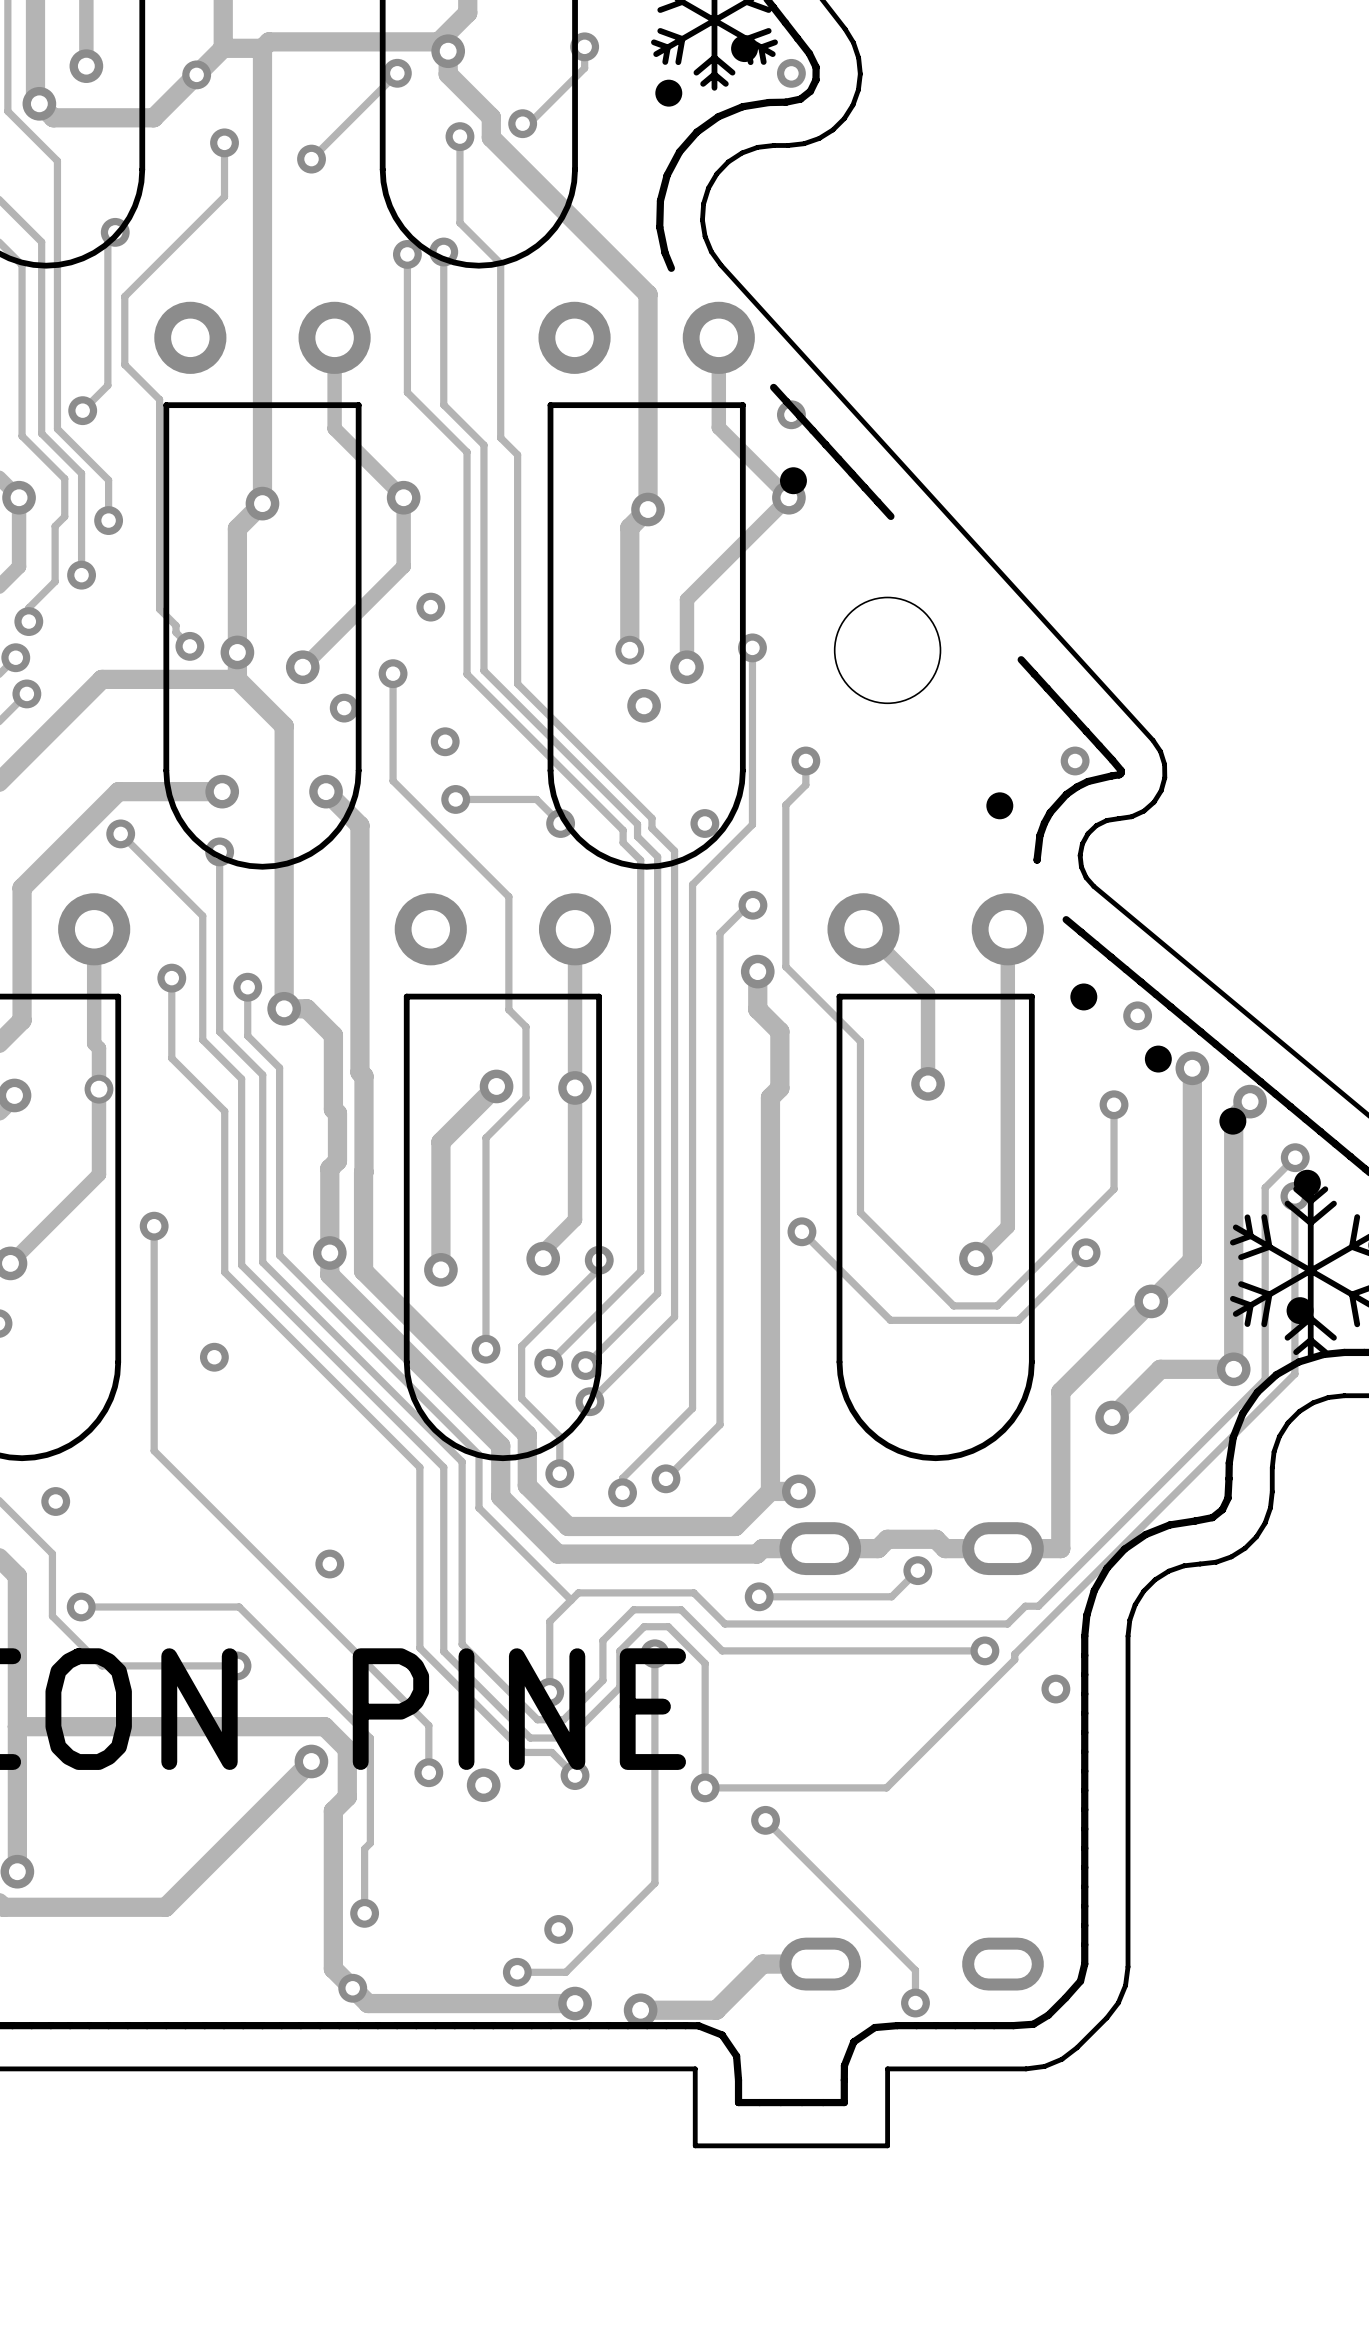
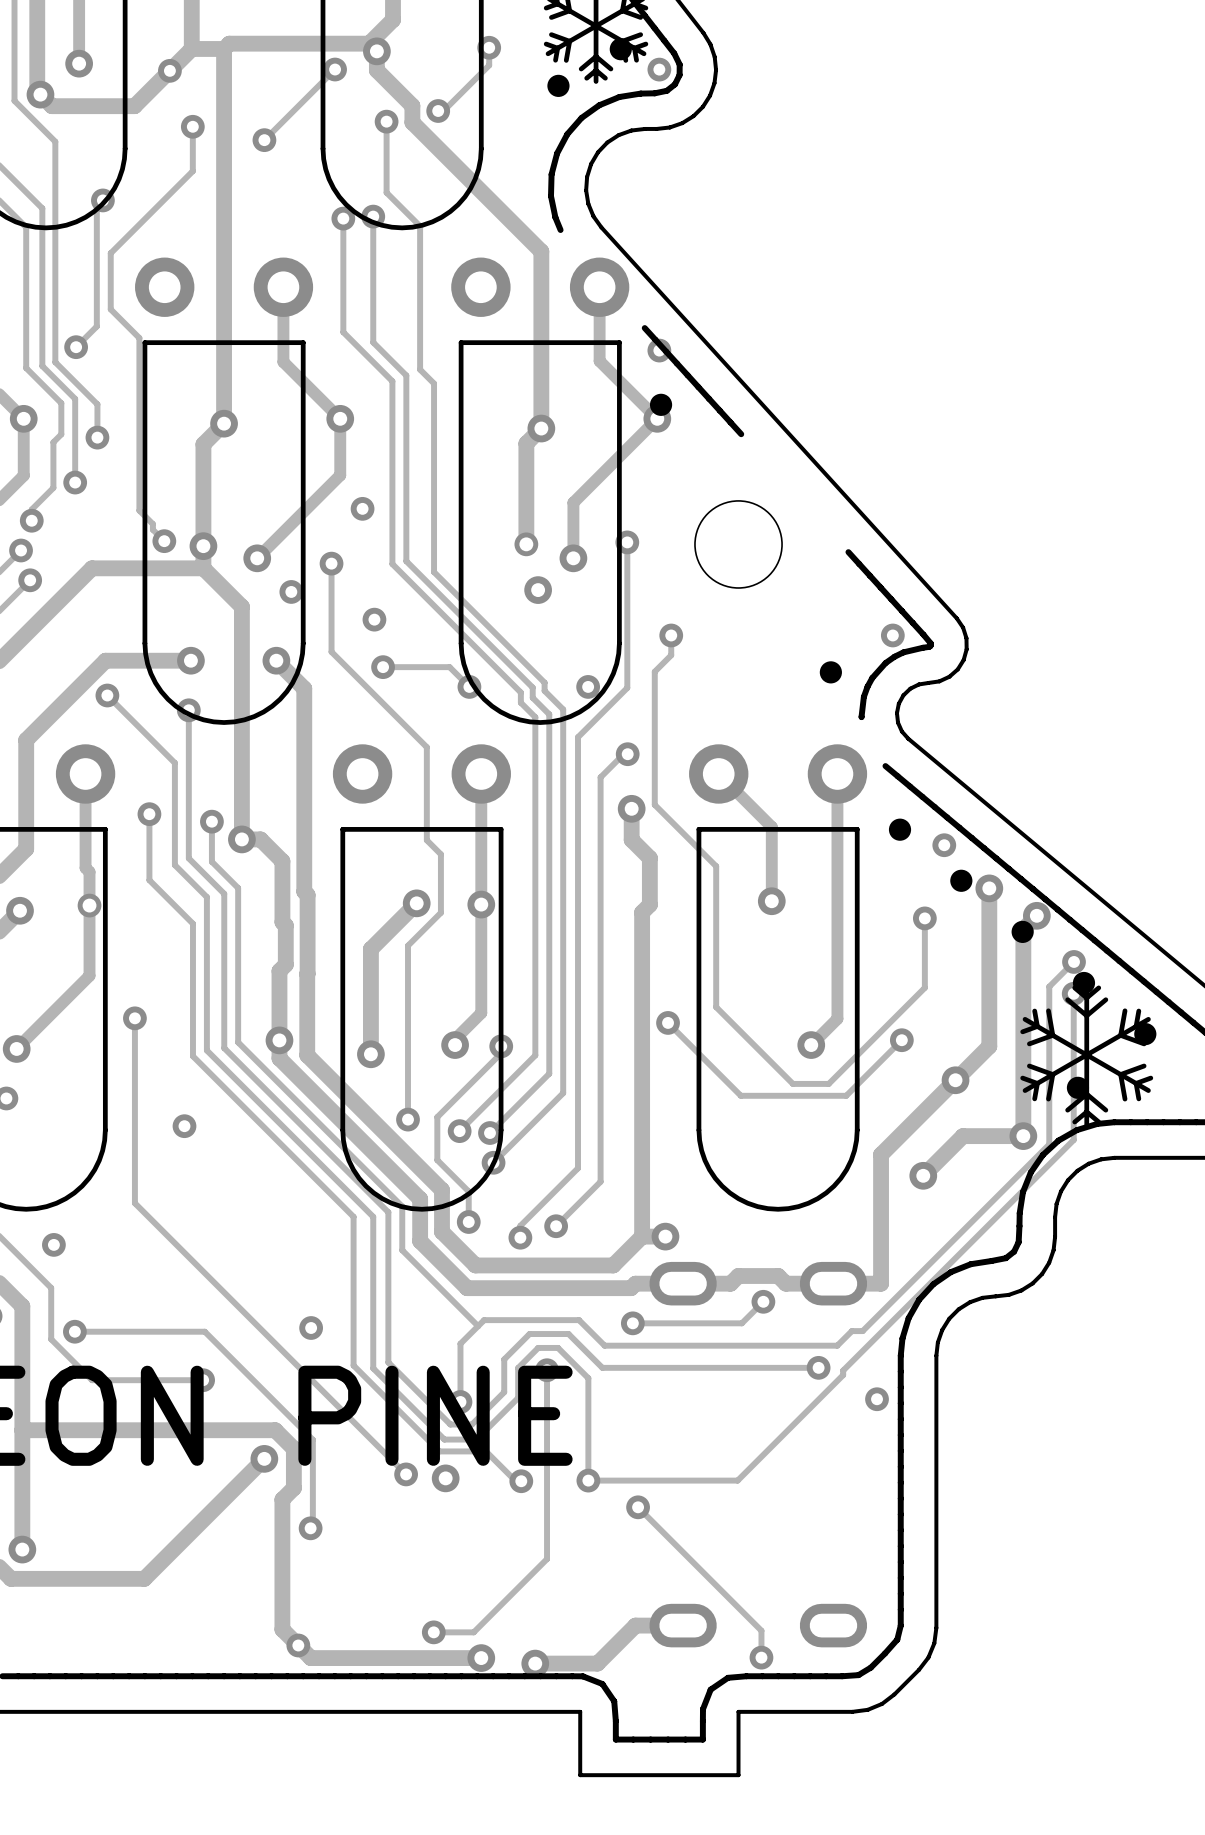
via position: (329, 1564) -> (311, 1328)
track: (428, 1725) (428, 1772) -> (360, 1429) (406, 1474)
track: (551, 1752) (575, 1775) -> (462, 1451) (486, 1451) (515, 1481) (521, 1481)
via: (428, 1772) -> none
via: (575, 1775) -> none
via: none -> (406, 1474)
via position: (483, 1785) -> (445, 1478)
via: none -> (521, 1481)
track: (367, 1845) (364, 1848) (364, 1913) -> none
via: none -> (310, 1528)
via: (364, 1913) -> none
via: (558, 1929) -> none

